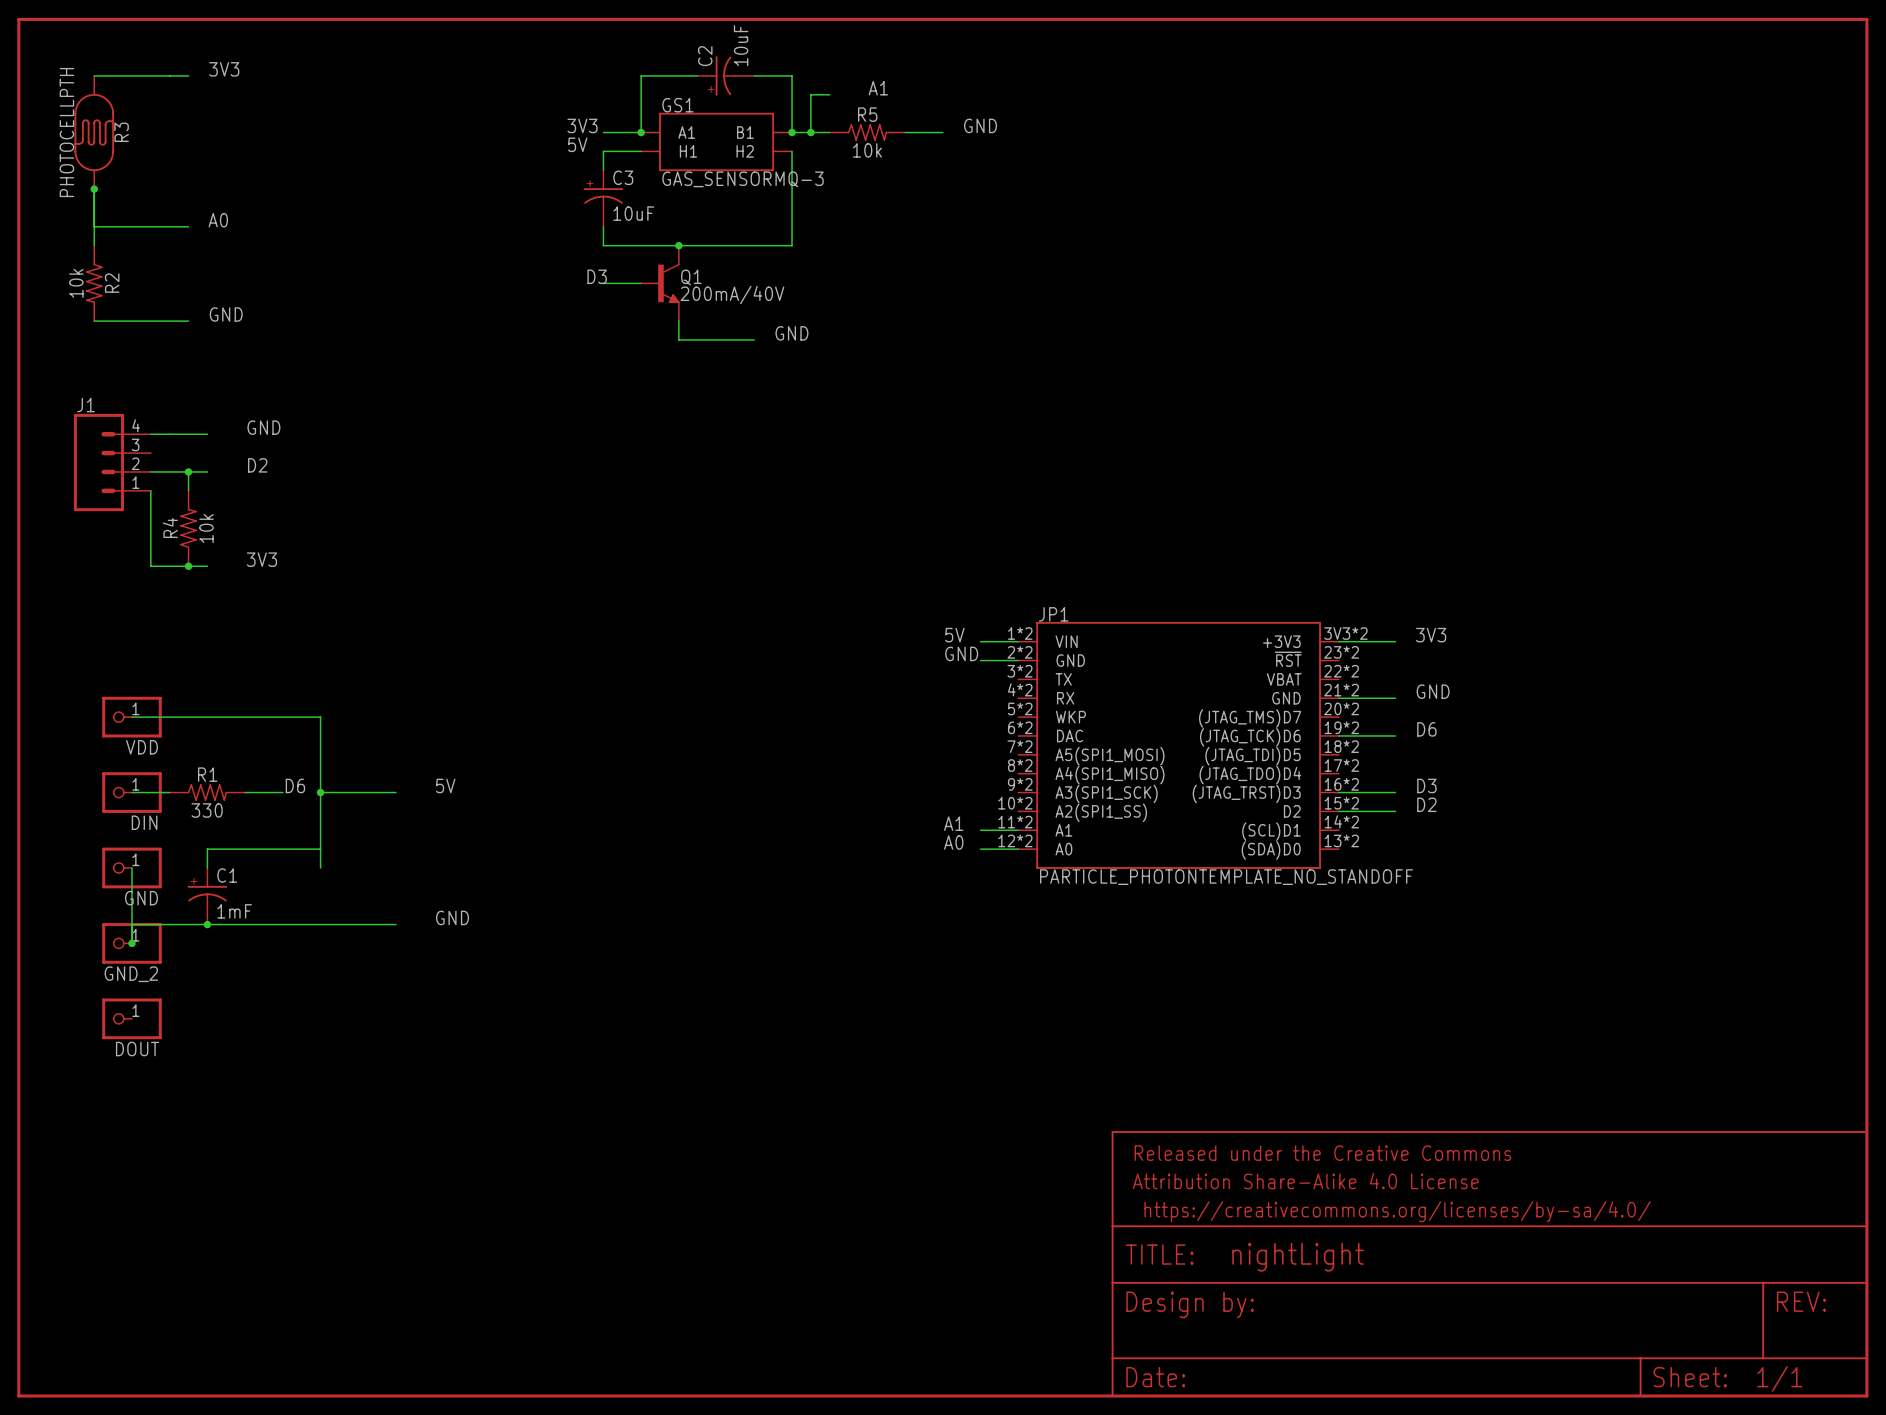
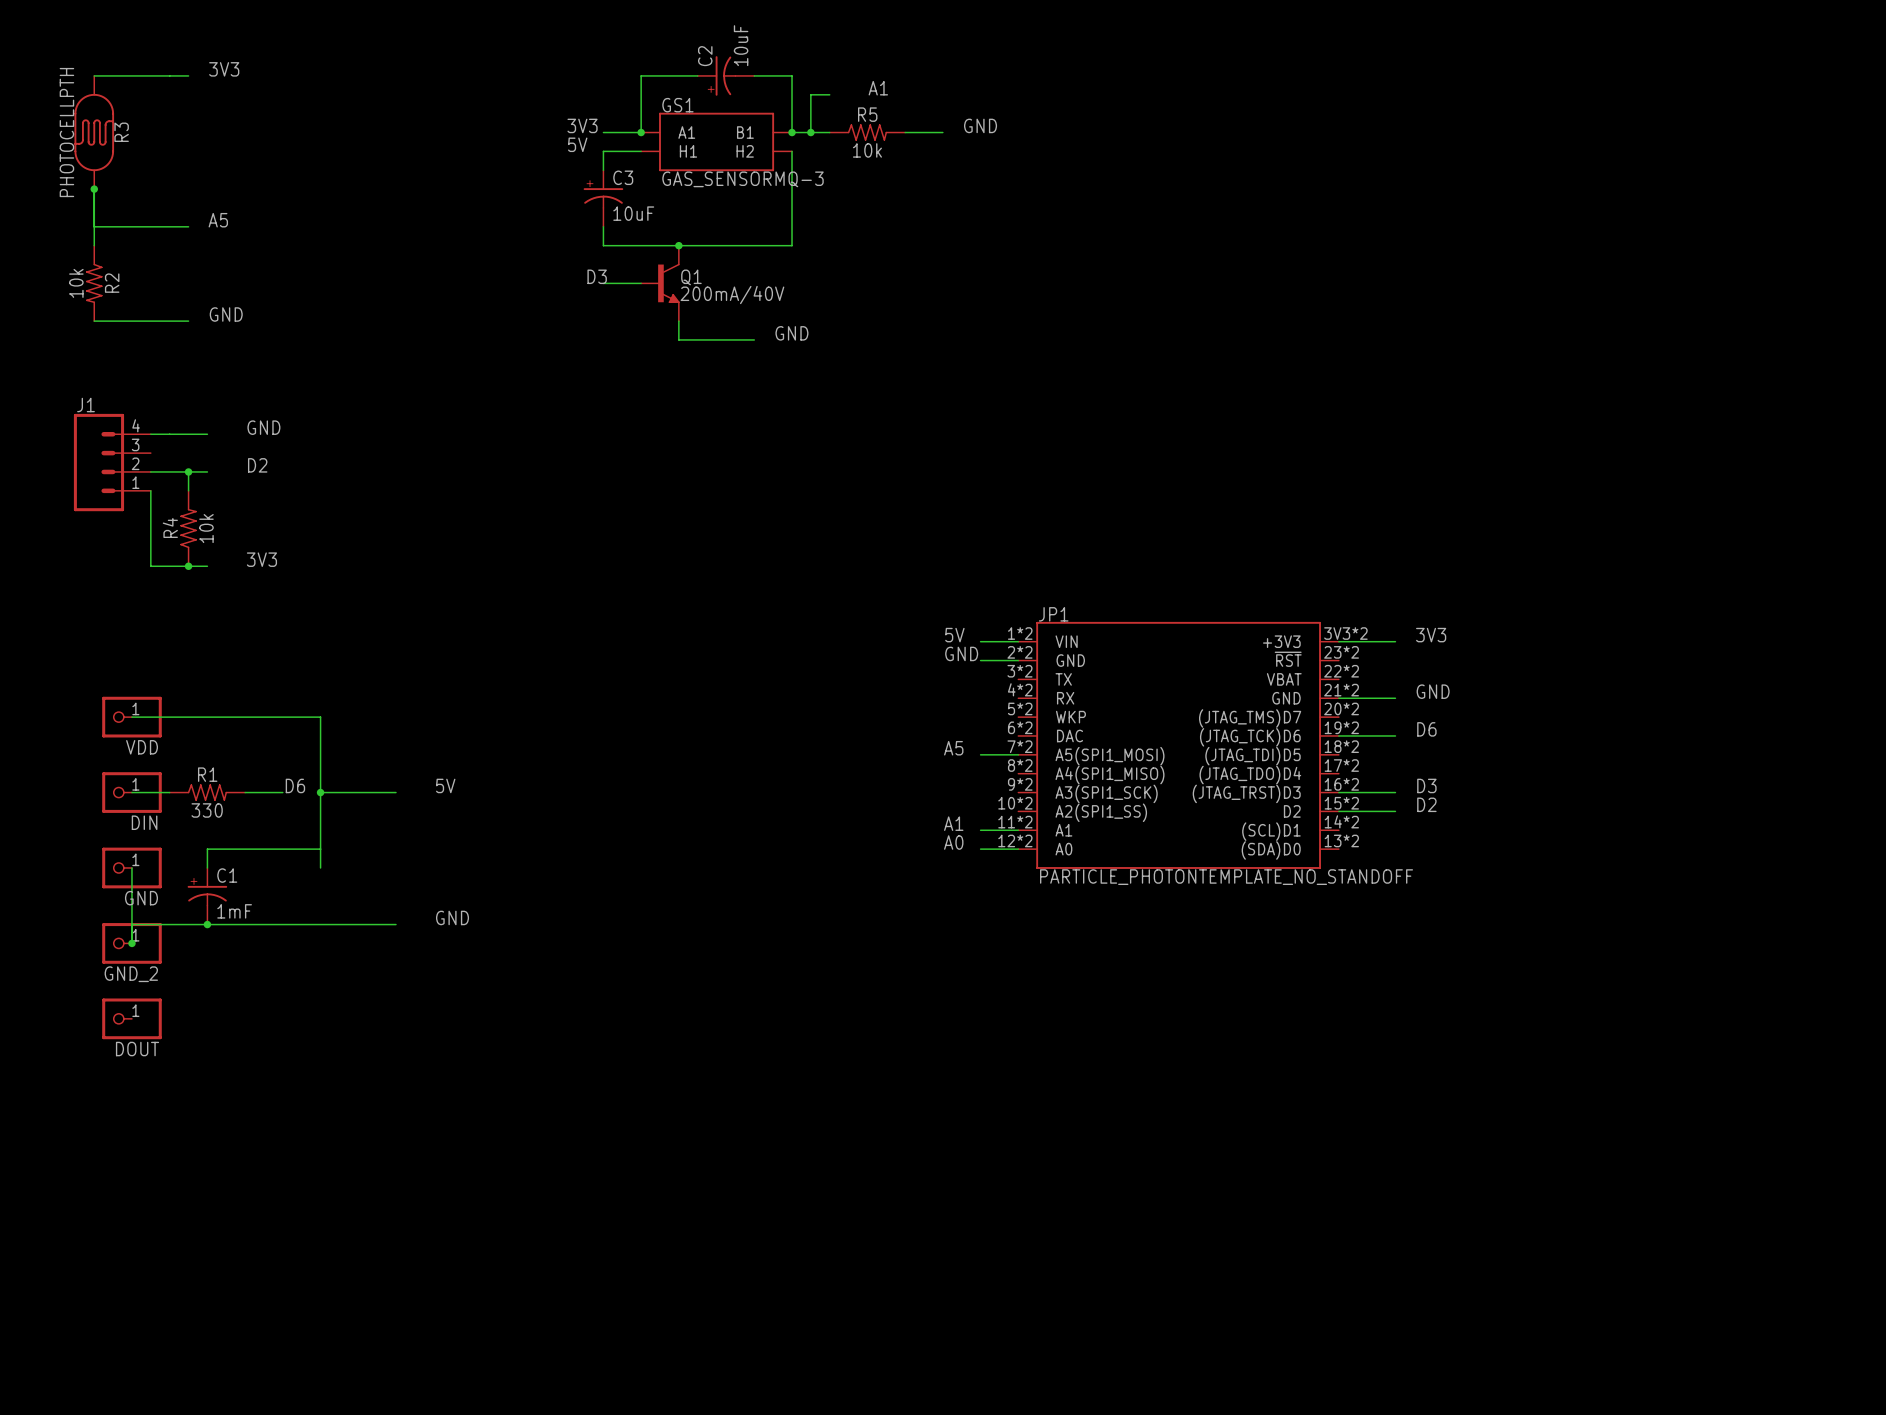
label: A0 (218, 220) -> A5 (218, 220)
part: (942, 707) -> none
label: none -> A5 (953, 748)
wire: none -> (980, 754) (1018, 754)
part: (1489, 1264) -> none

